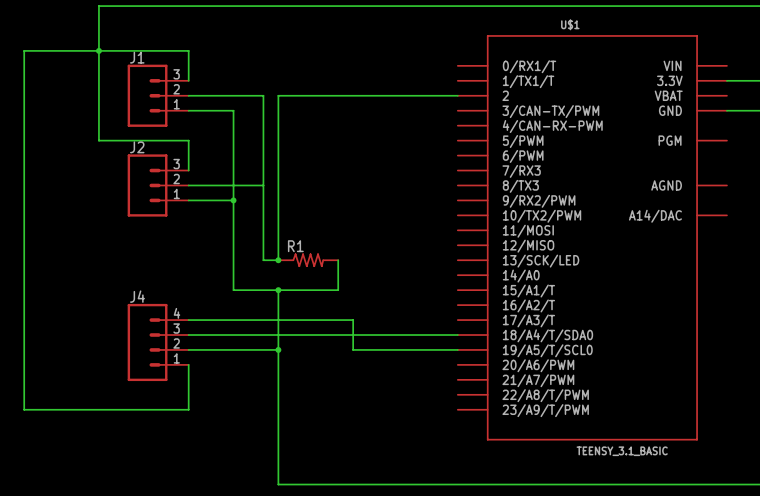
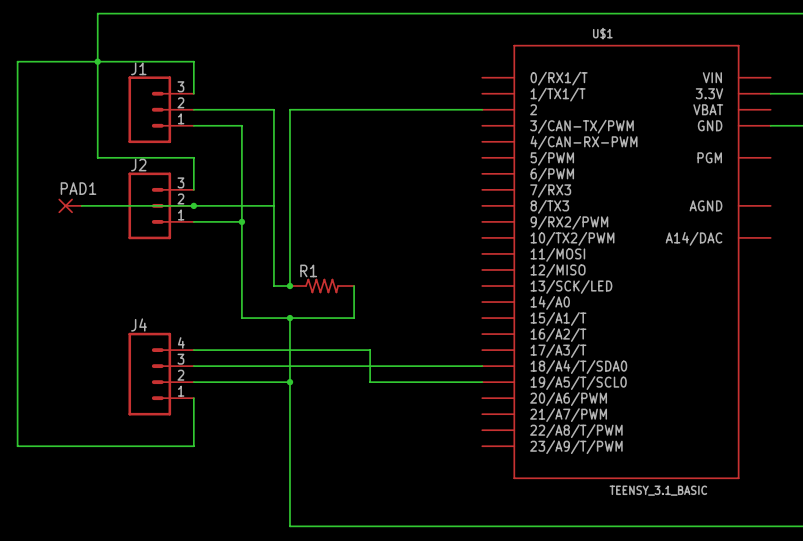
PAD1: none -> (70, 205)
wire: none -> (81, 205) (193, 205)
junction: none -> (193, 205)

